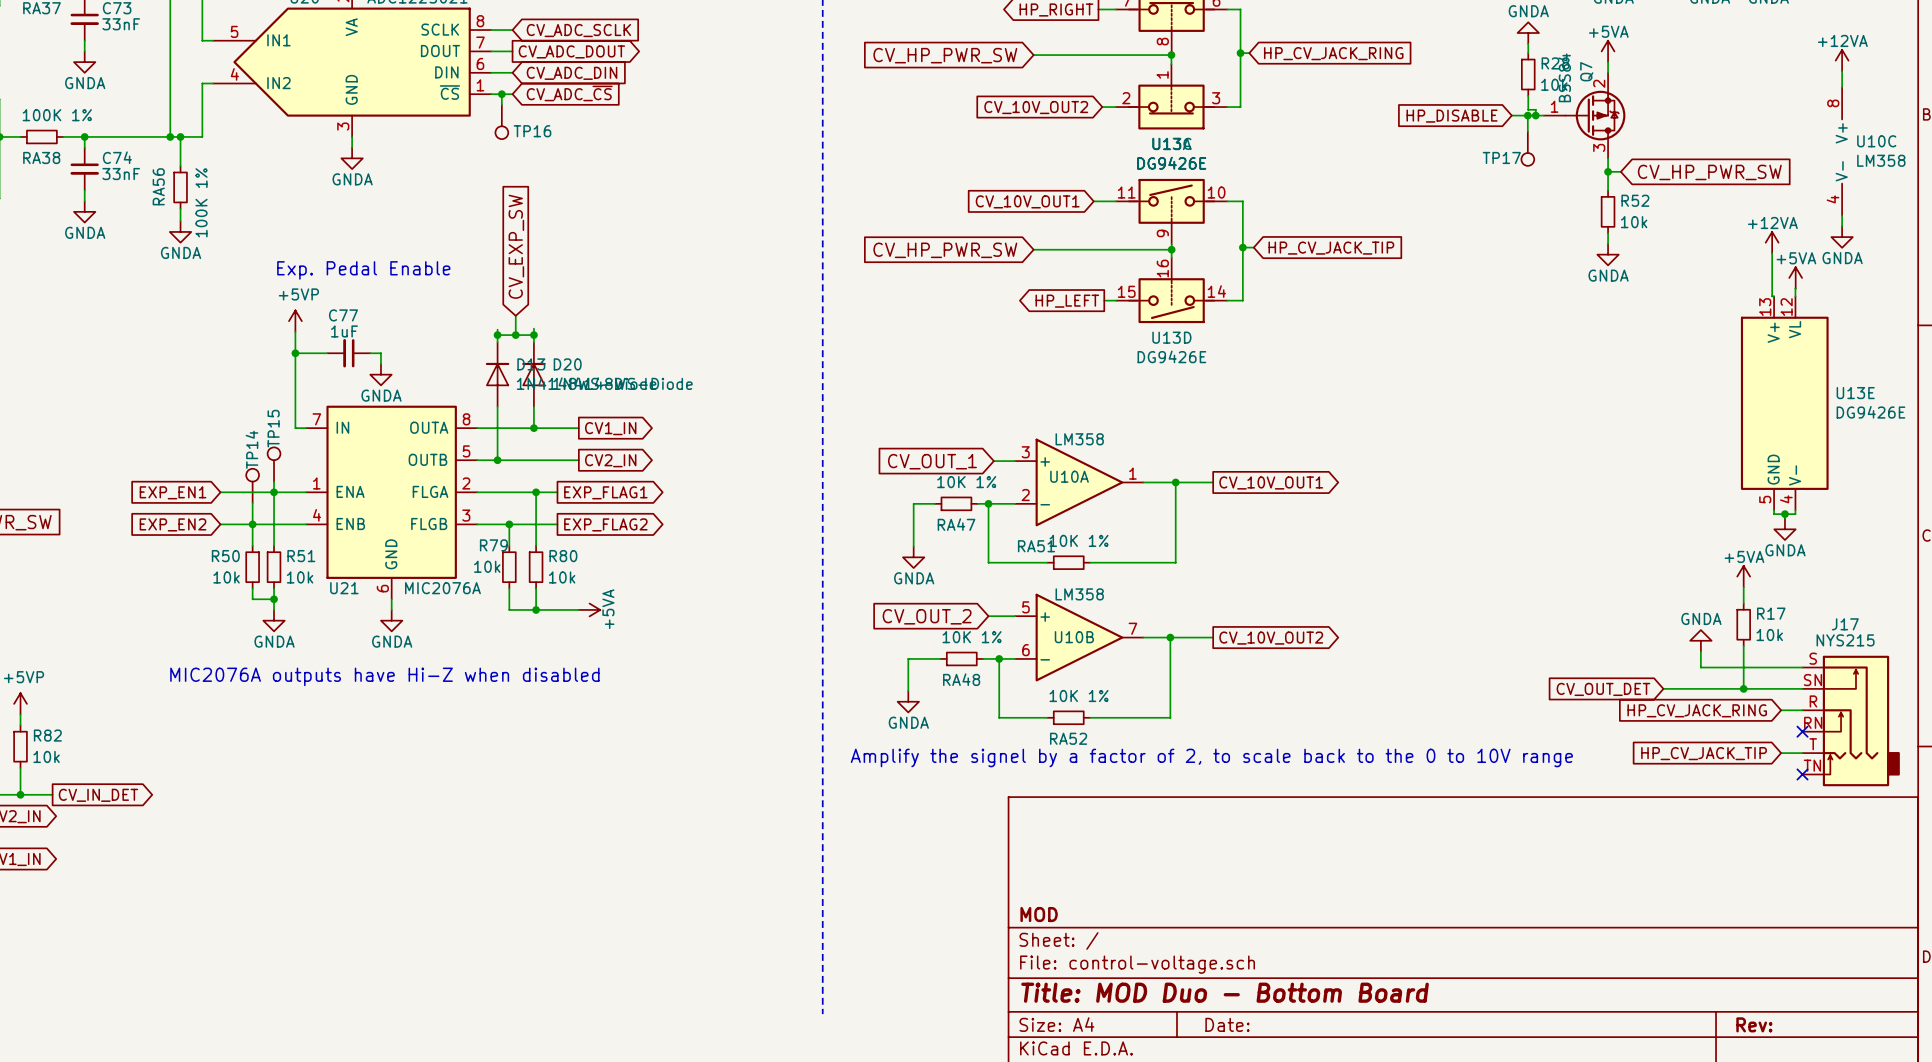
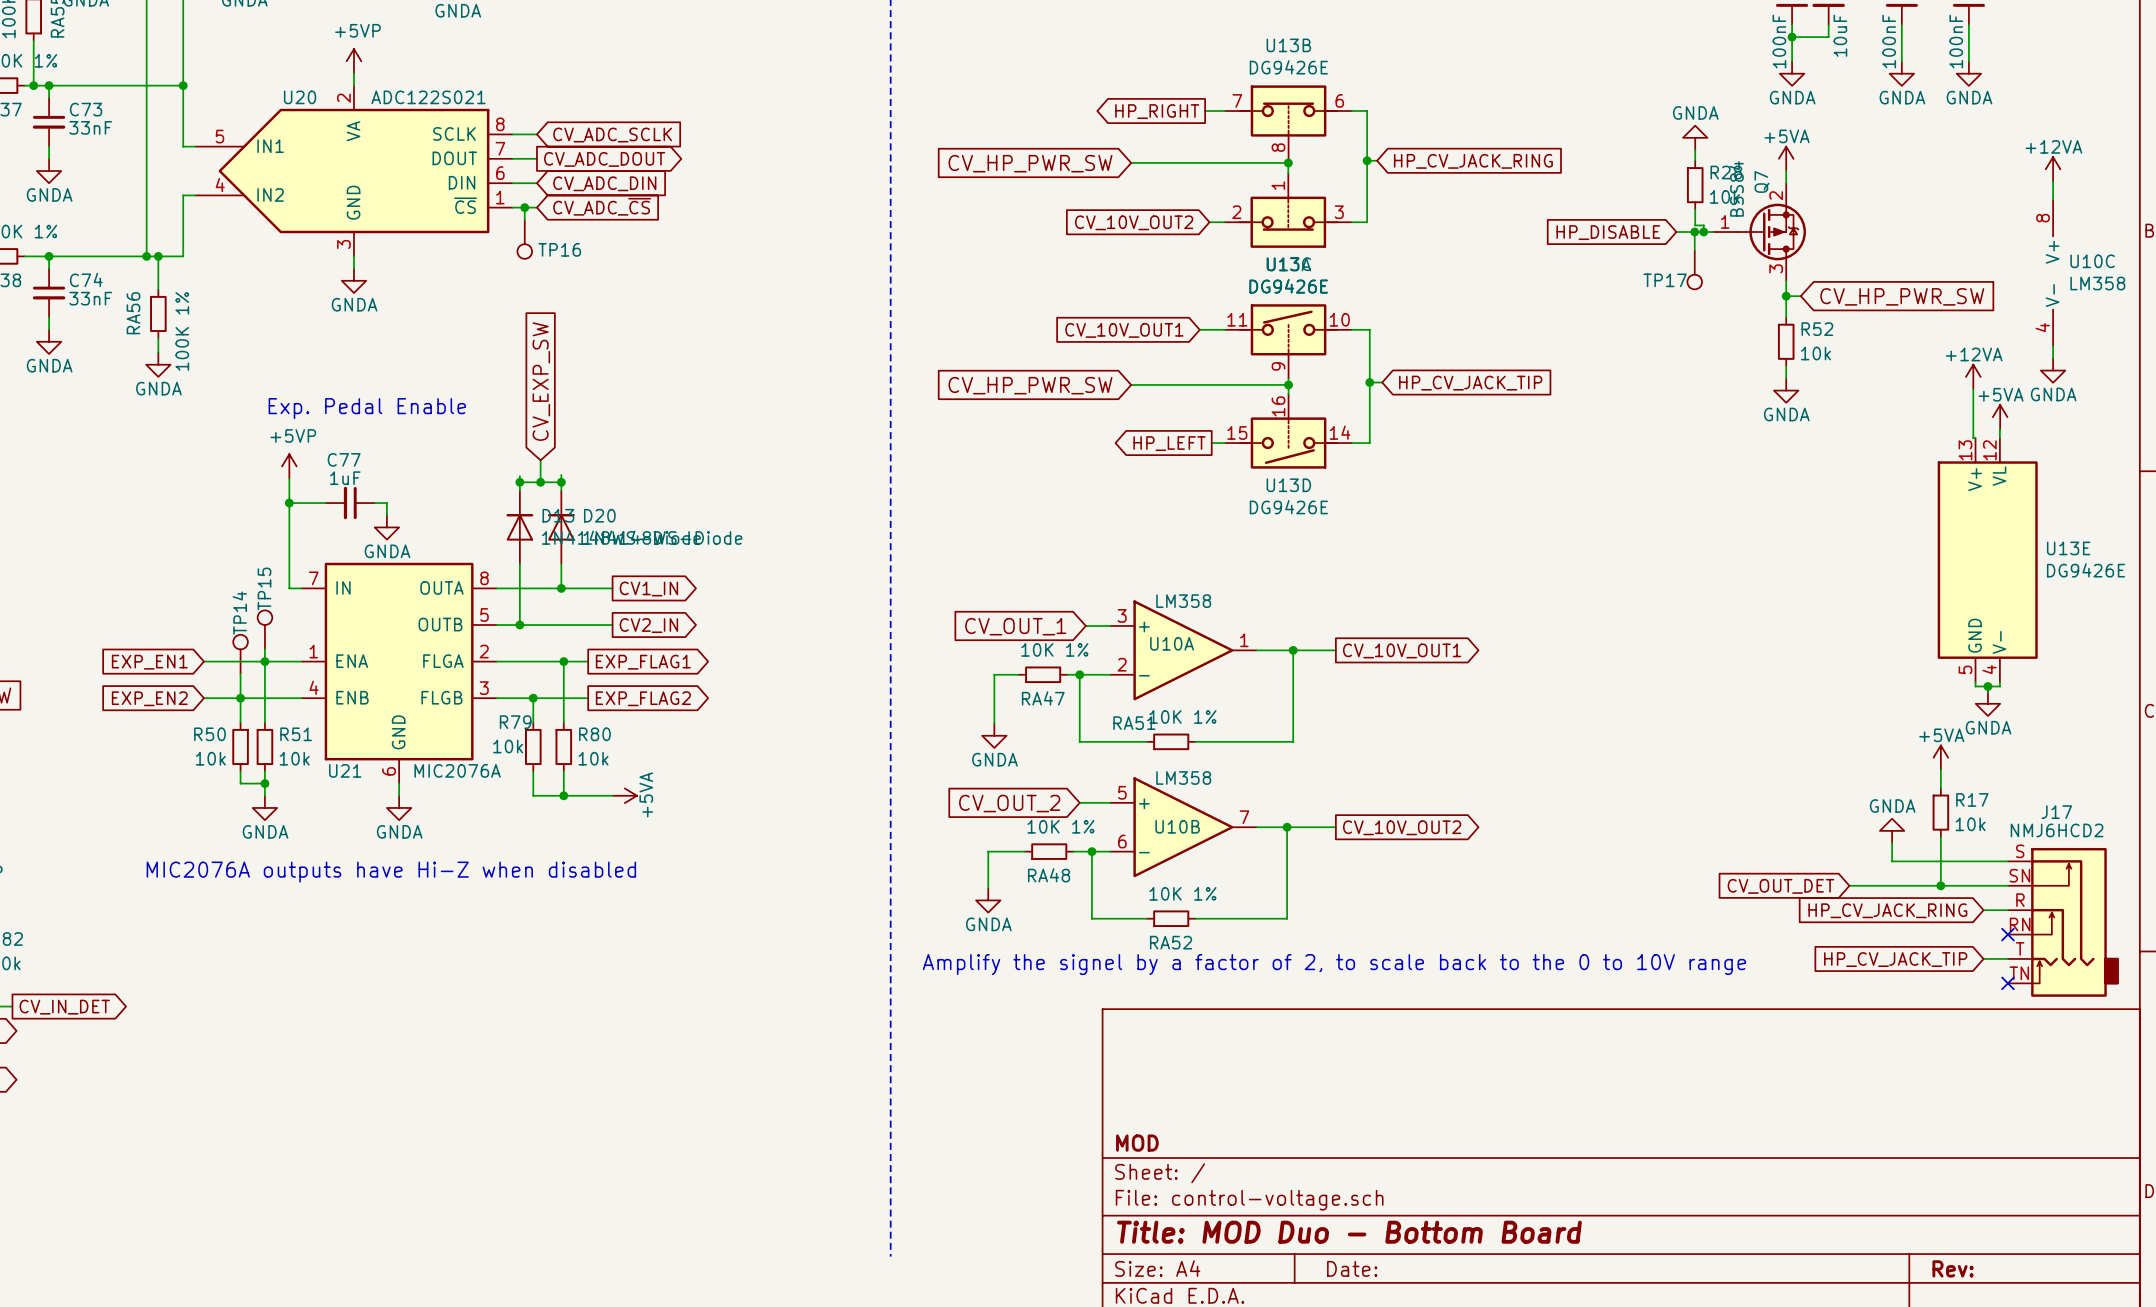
J17 value: NYS215 (1845, 640) -> NMJ6HCD2 (2057, 830)

